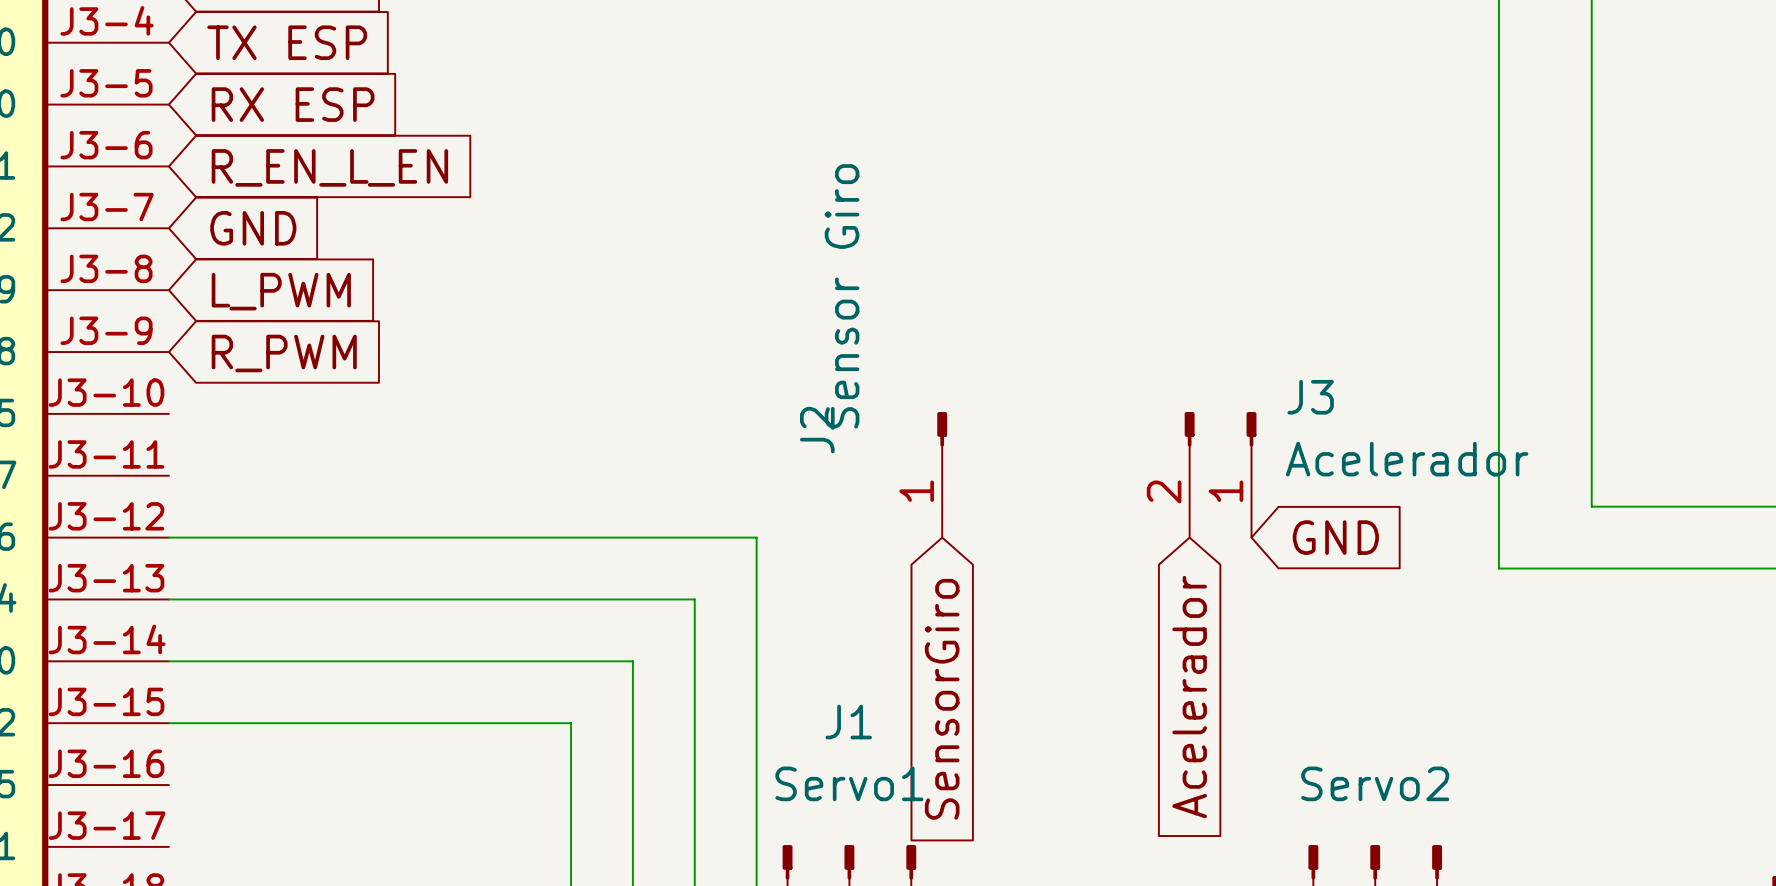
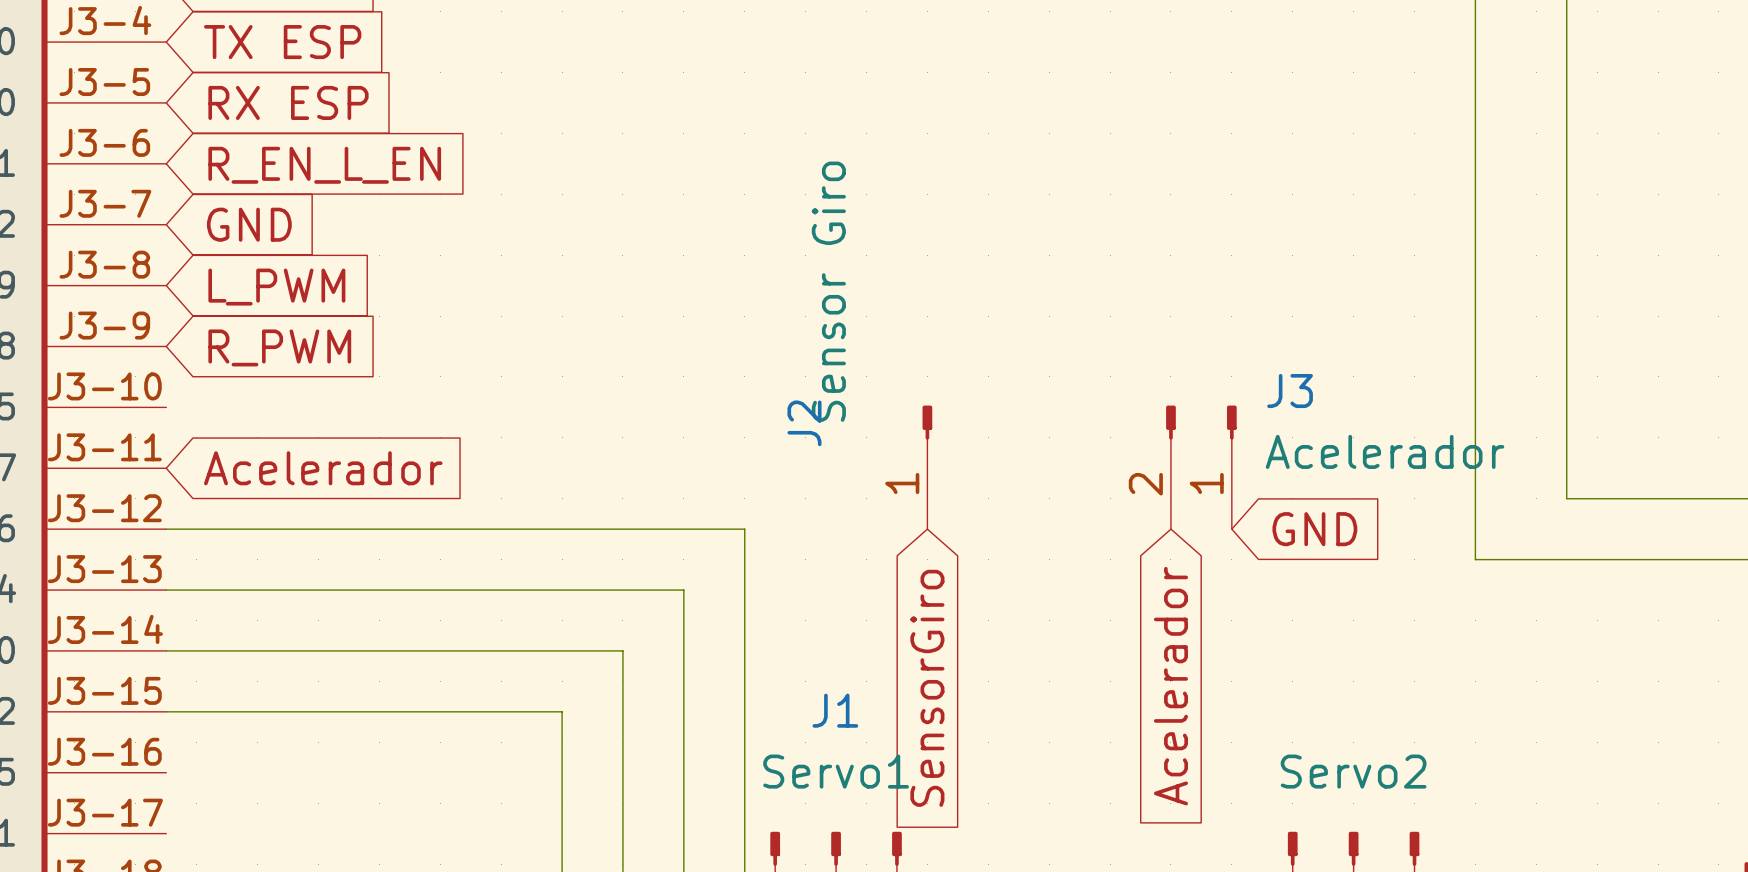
global label: none -> Acelerador (323, 468)

